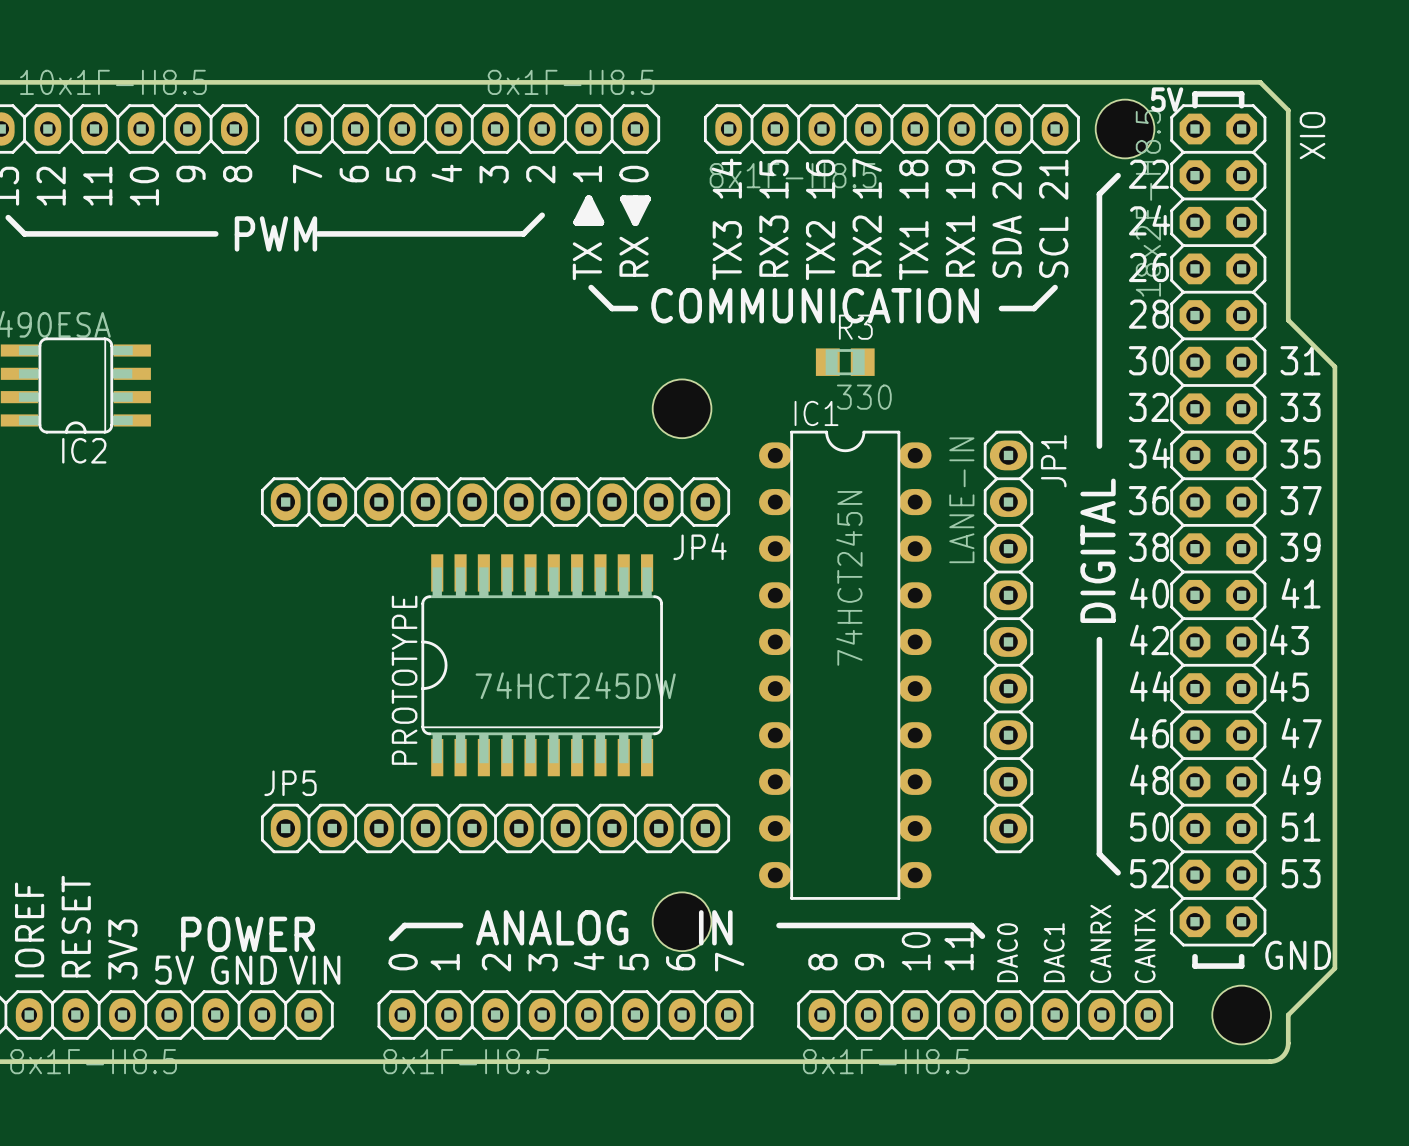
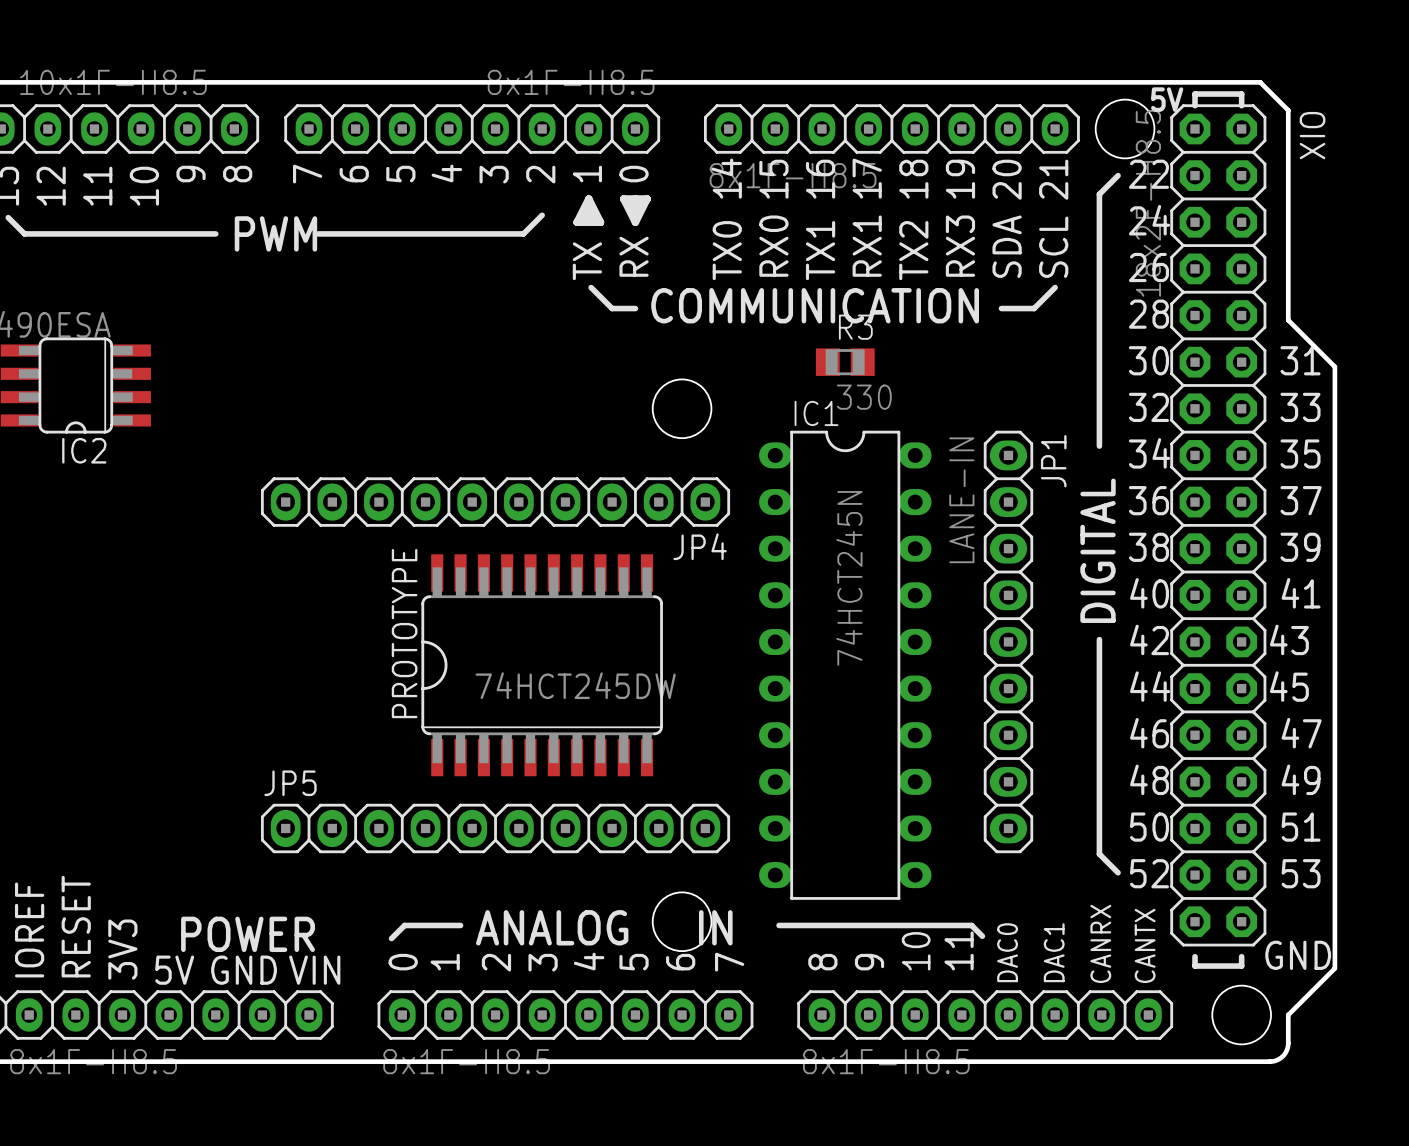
text: RX3 (773, 246) -> RX0 (773, 246)
text: RX2 (867, 246) -> RX1 (867, 246)
text: RX1 (960, 246) -> RX3 (960, 246)
text: TX3 (727, 250) -> TX0 (727, 250)
text: TX2 (820, 250) -> TX1 (820, 250)
text: TX1 (913, 250) -> TX2 (913, 250)
PROTOTYPE name position: PROTOTYPE (404, 680) -> PROTOTYPE (404, 633)

